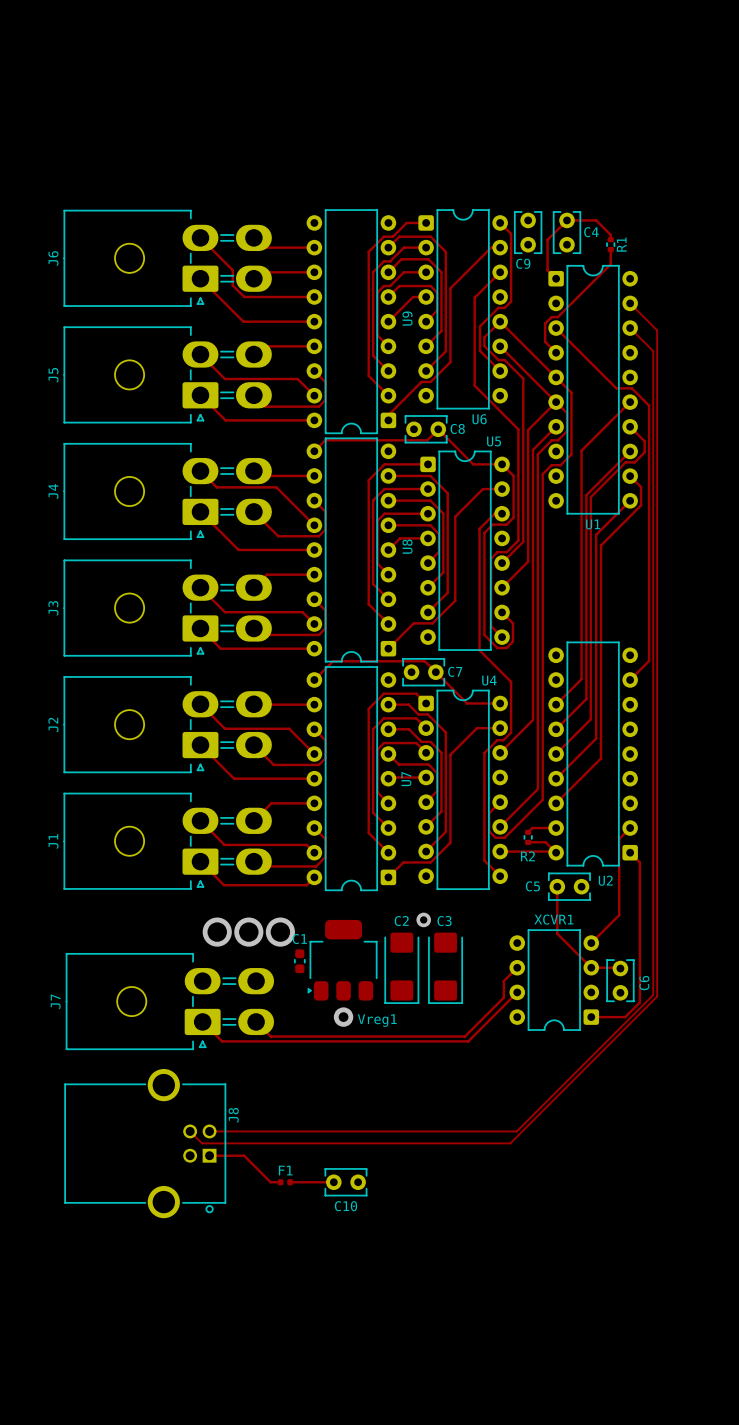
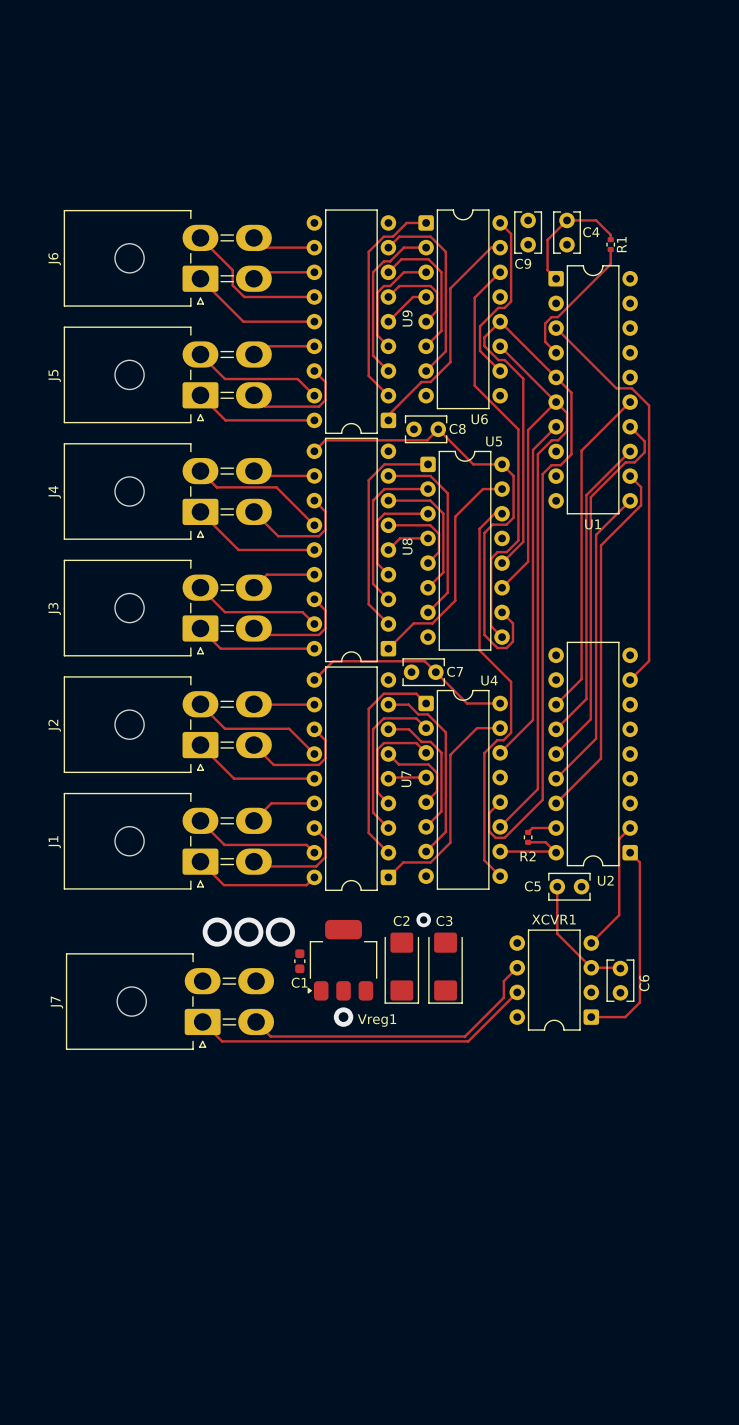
track: (630, 303) (657, 330) (657, 996) (510, 1143) (202, 1143) (190, 1131) -> none
track: (630, 328) (653, 351) (653, 994) (516, 1131) (209, 1131) -> none
C1 name position: C1 (299, 939) -> C1 (299, 982)
J8: (145, 1143) -> none
track: (209, 1155) (244, 1155) (270, 1182) (280, 1182) -> none
F1: (285, 1182) -> none
track: (290, 1182) (333, 1182) -> none
C10: (345, 1182) -> none

